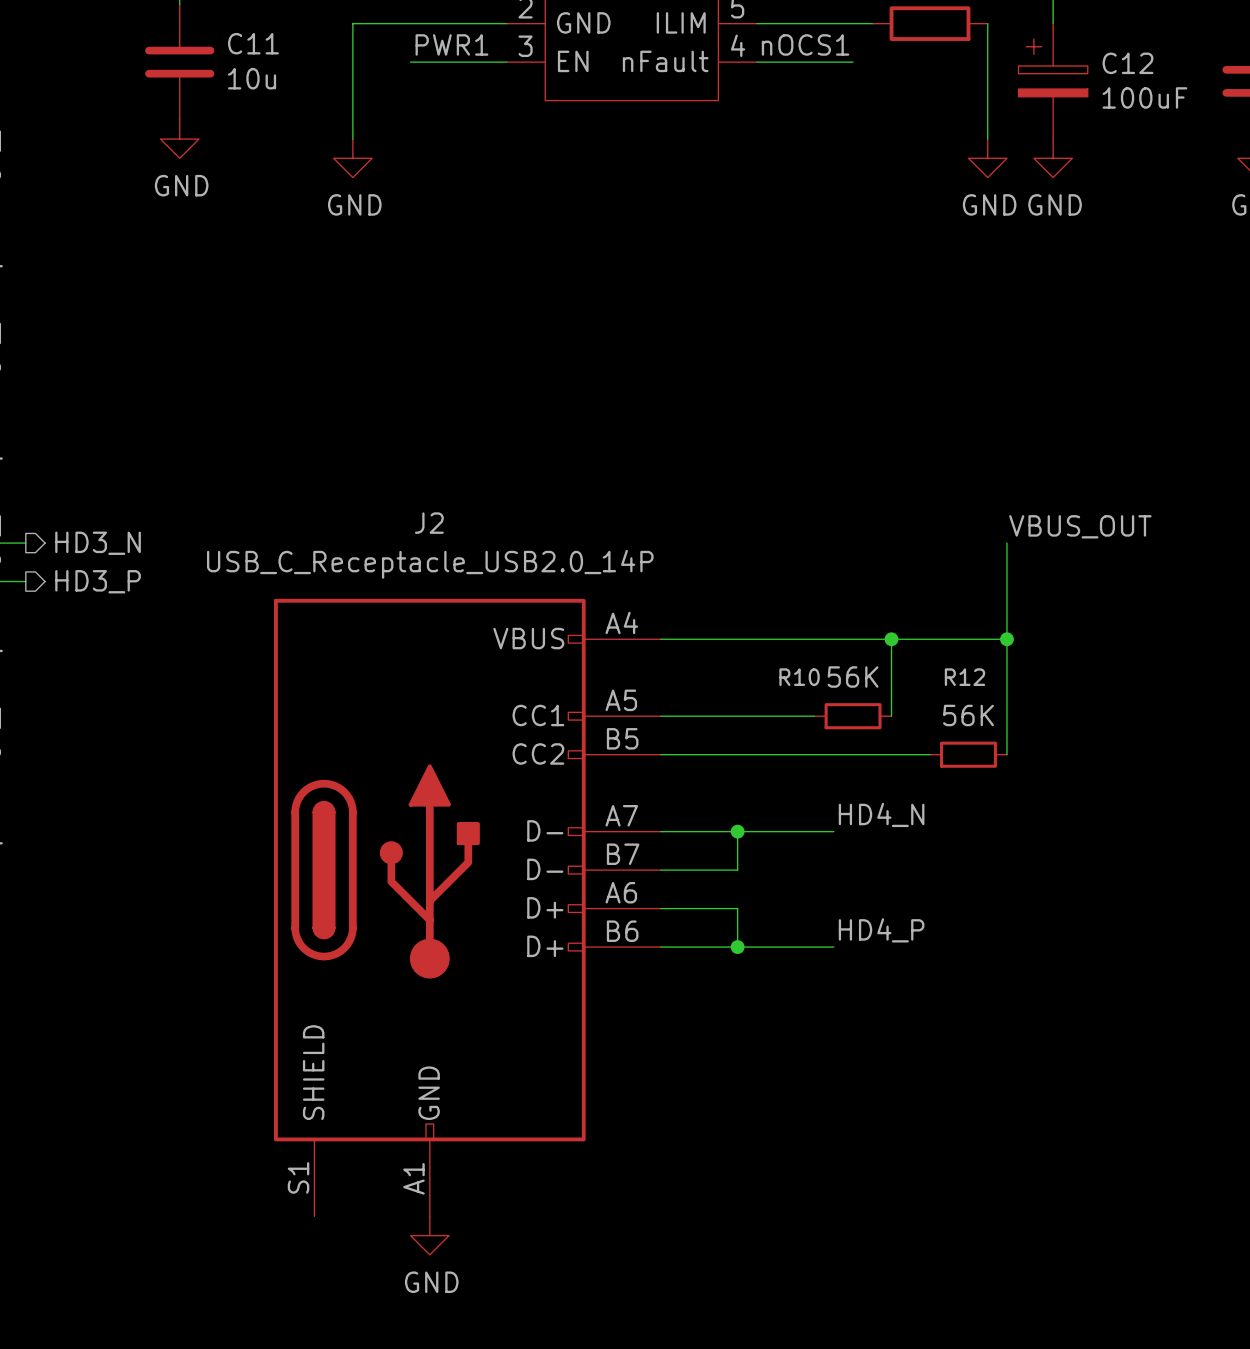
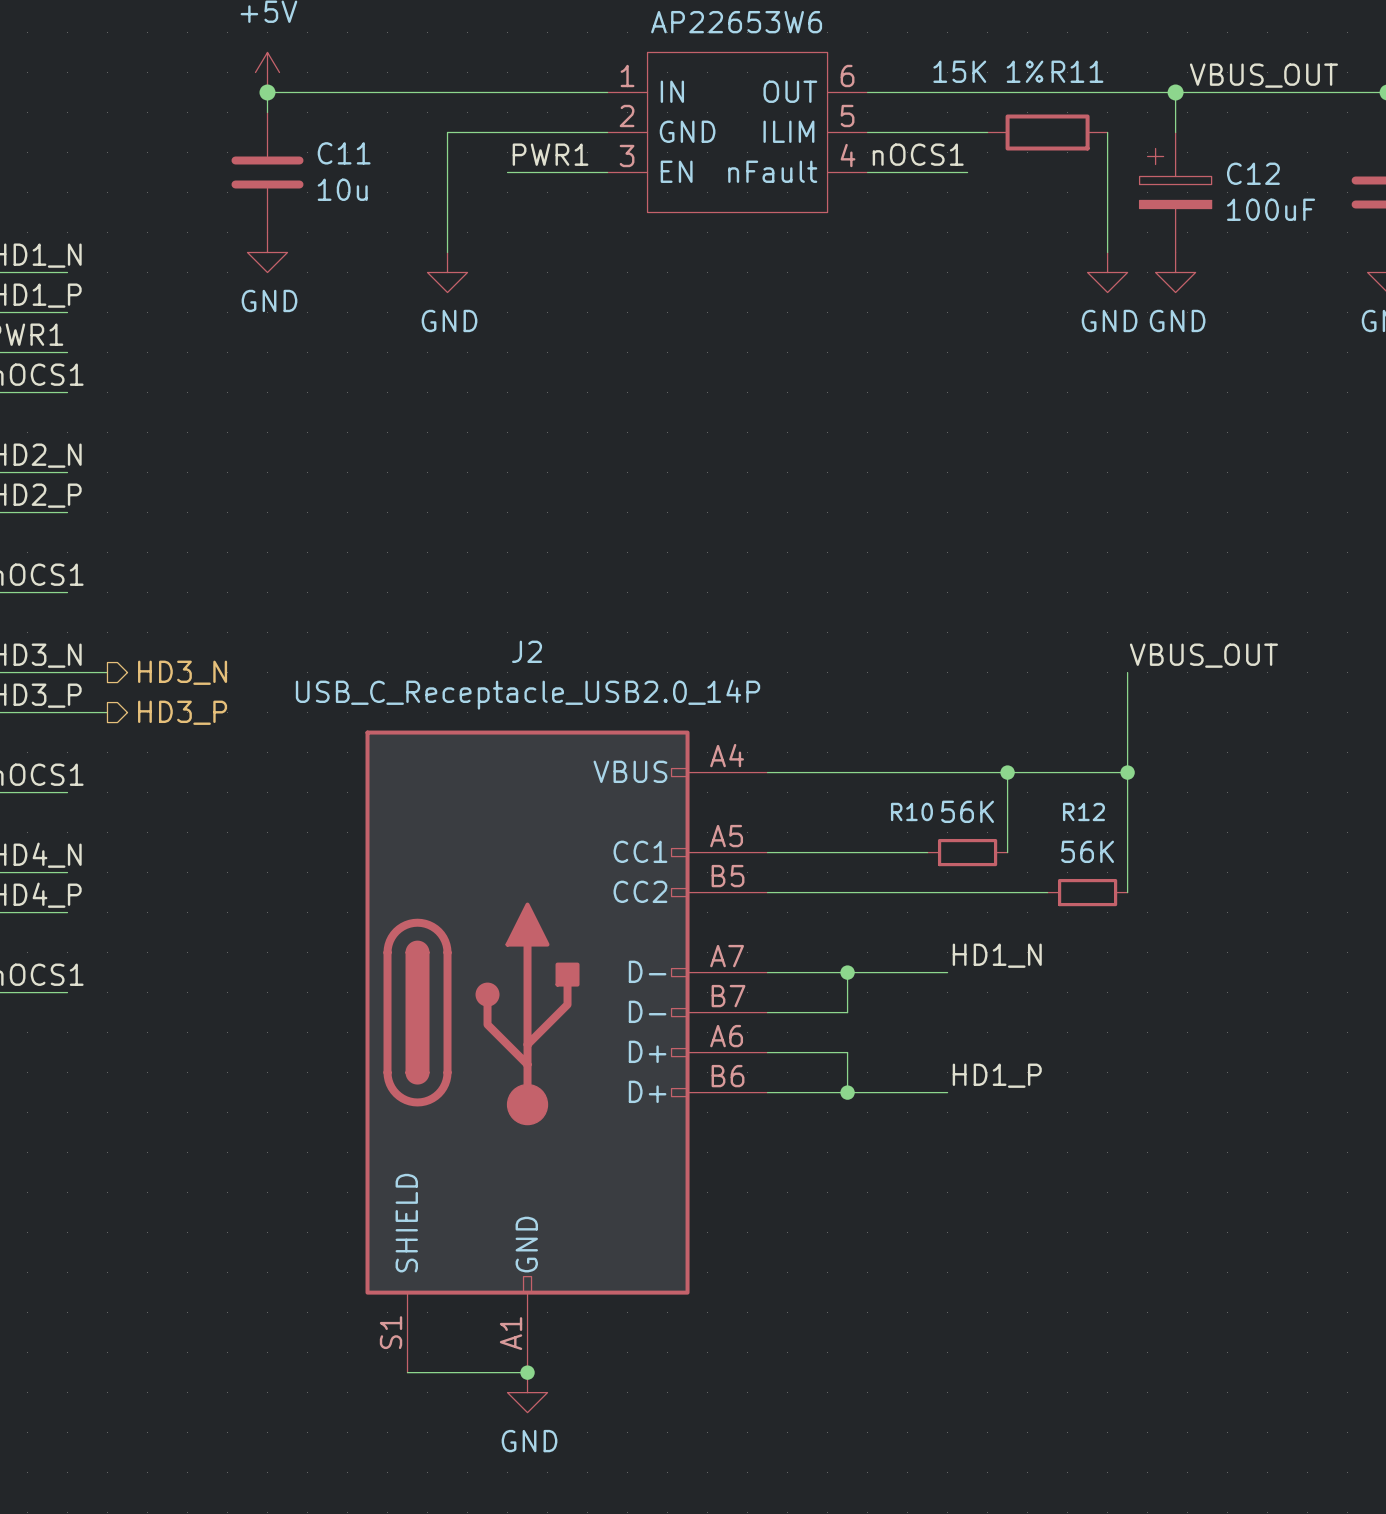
label: HD4_N (881, 814) -> HD1_N (997, 955)
label: HD4_P (881, 930) -> HD1_P (997, 1075)
wire: none -> (407, 1372) (527, 1372)
junction: none -> (527, 1372)

